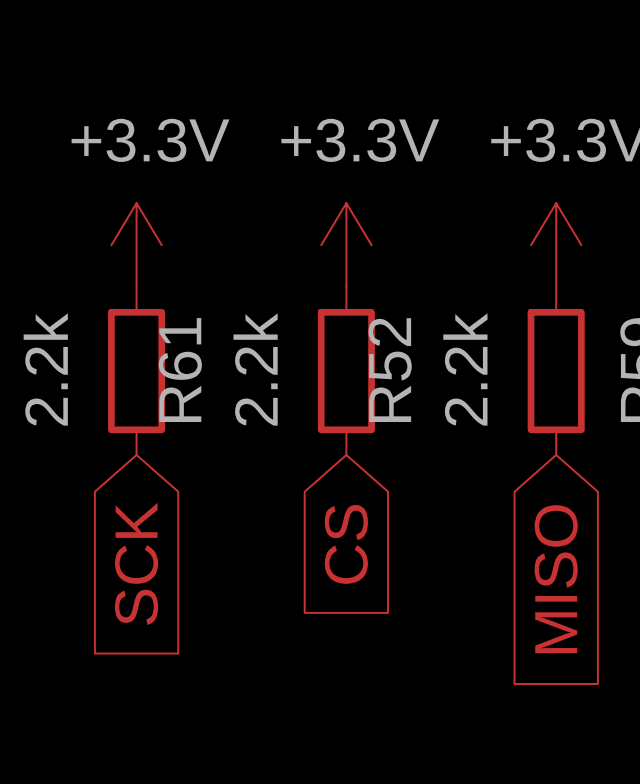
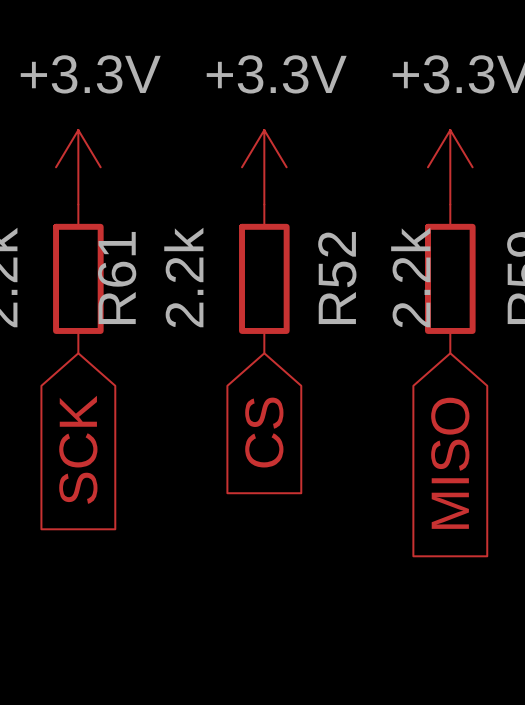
R52 value position: 2.2k (465, 369) -> 2.2k (410, 277)
R52 name position: R52 (390, 370) -> R52 (337, 278)

